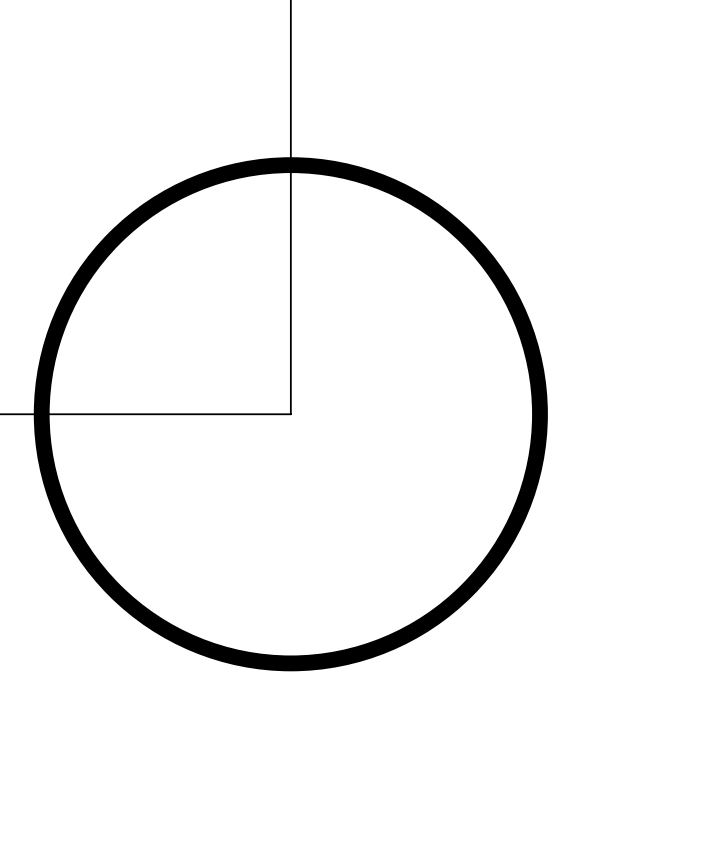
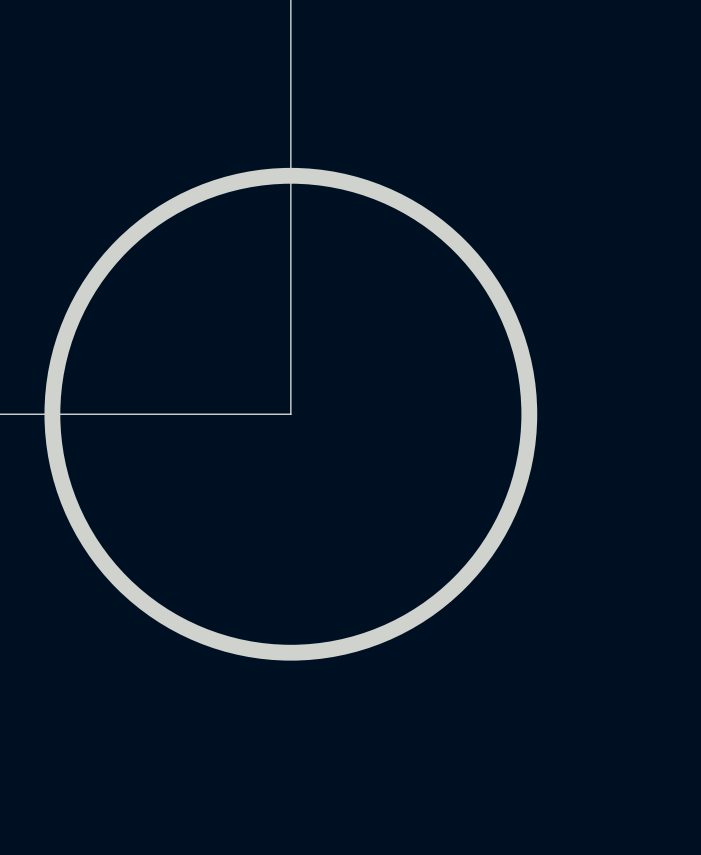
round board edge size: [33, 157, 548, 672] -> [44, 167, 538, 661]

